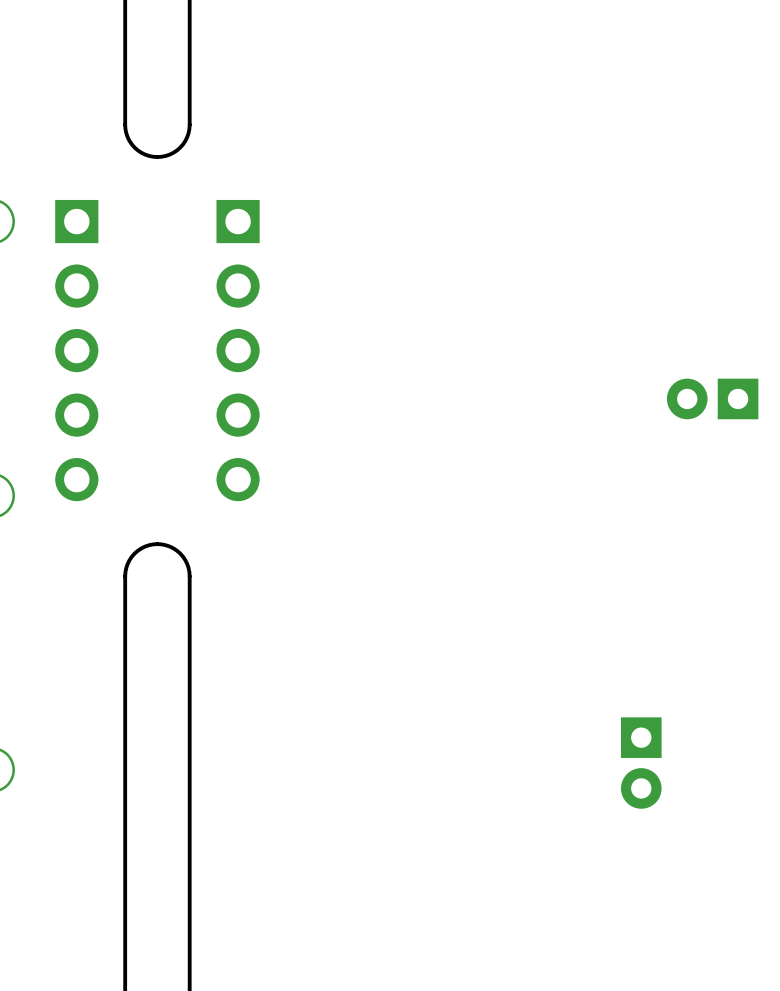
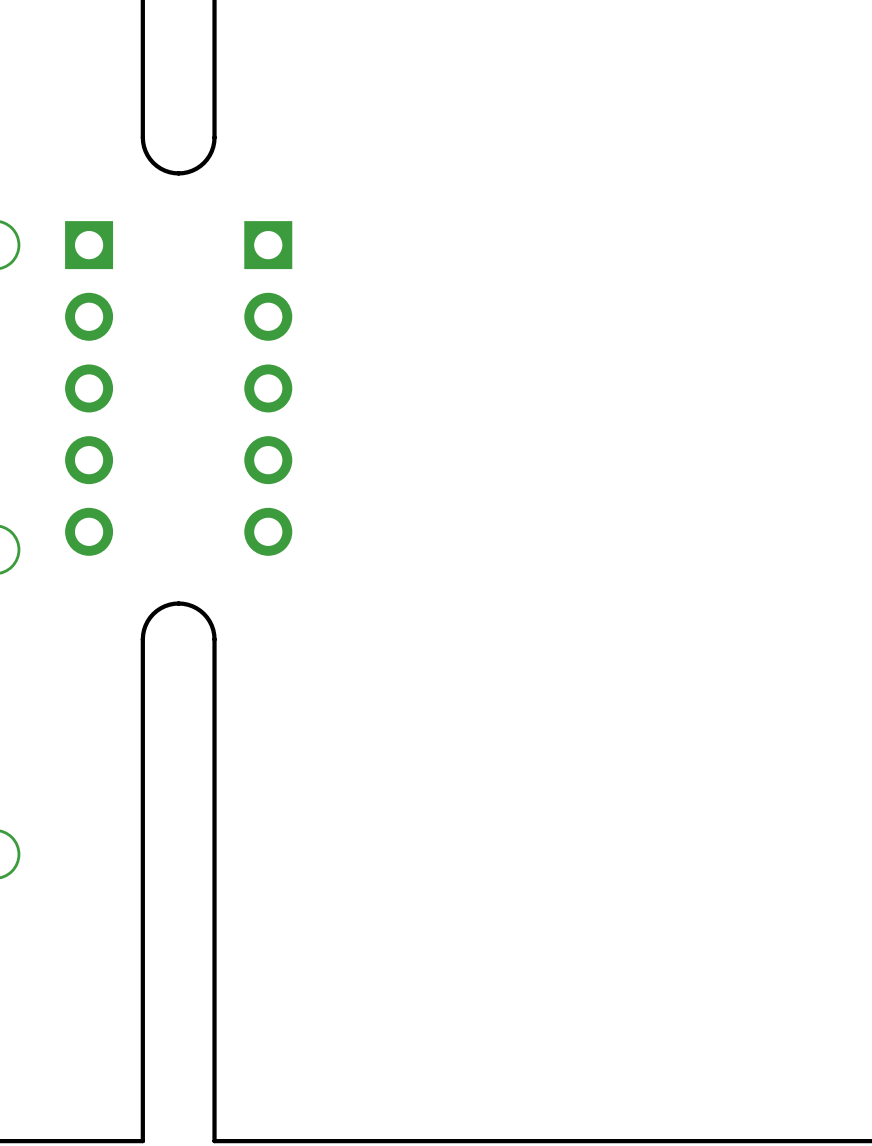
part: (712, 398) -> none
part: (641, 763) -> none

